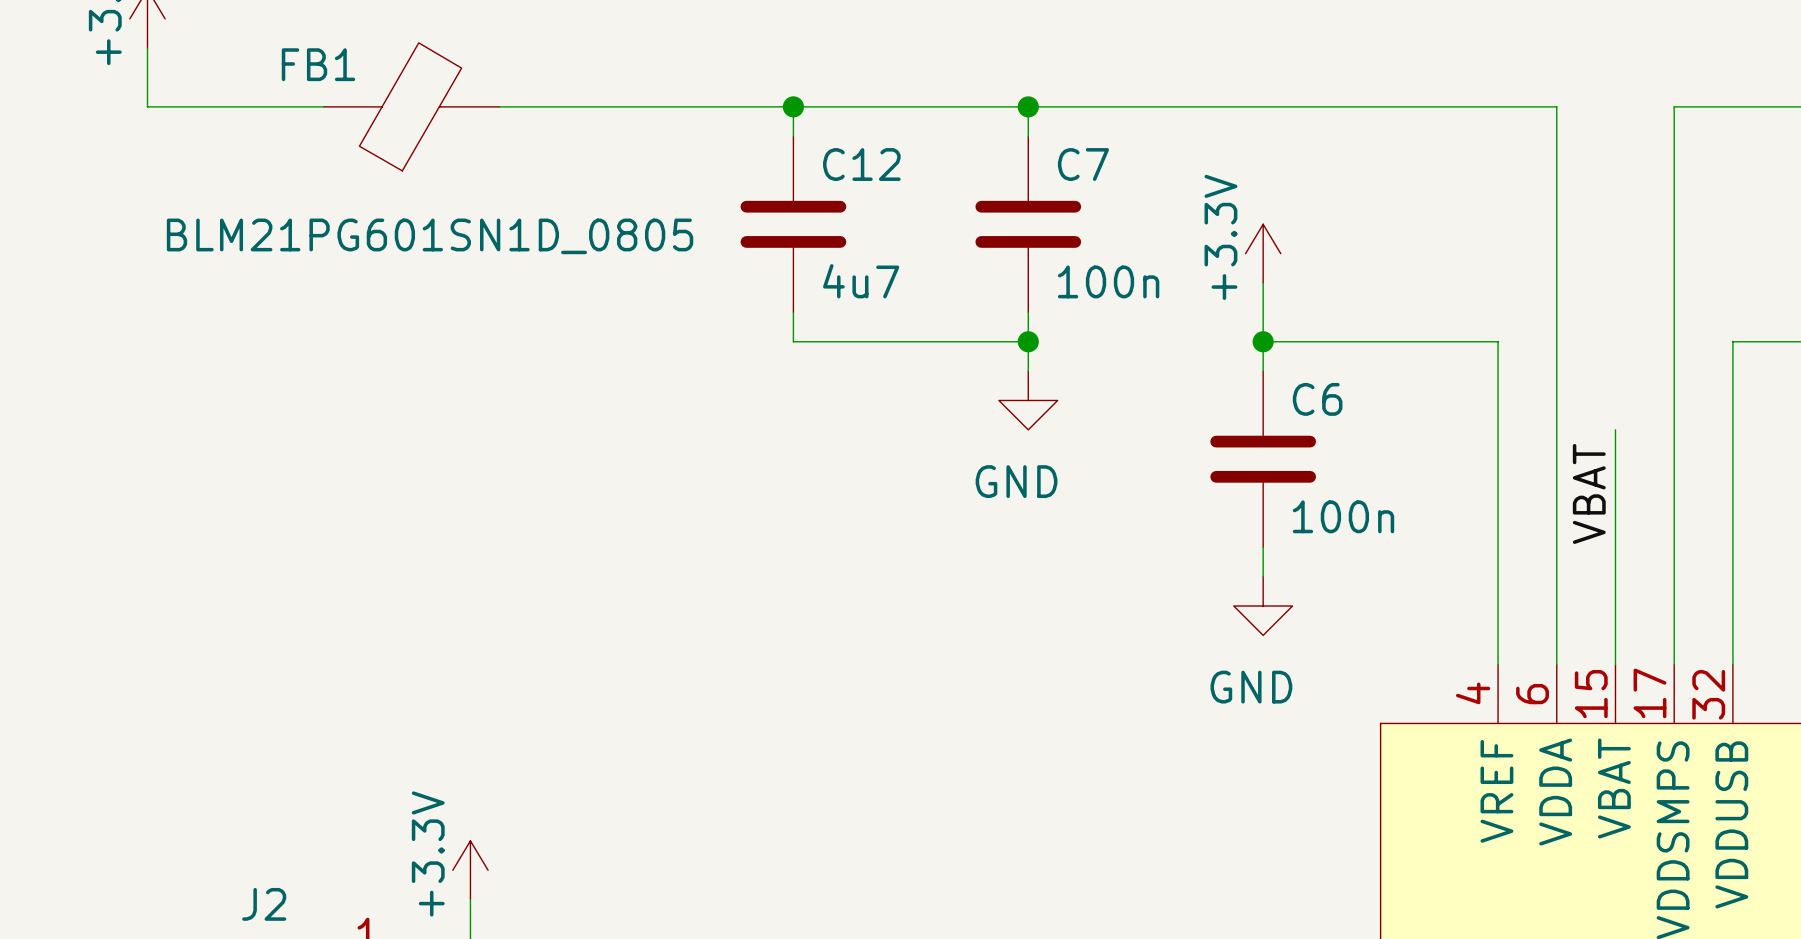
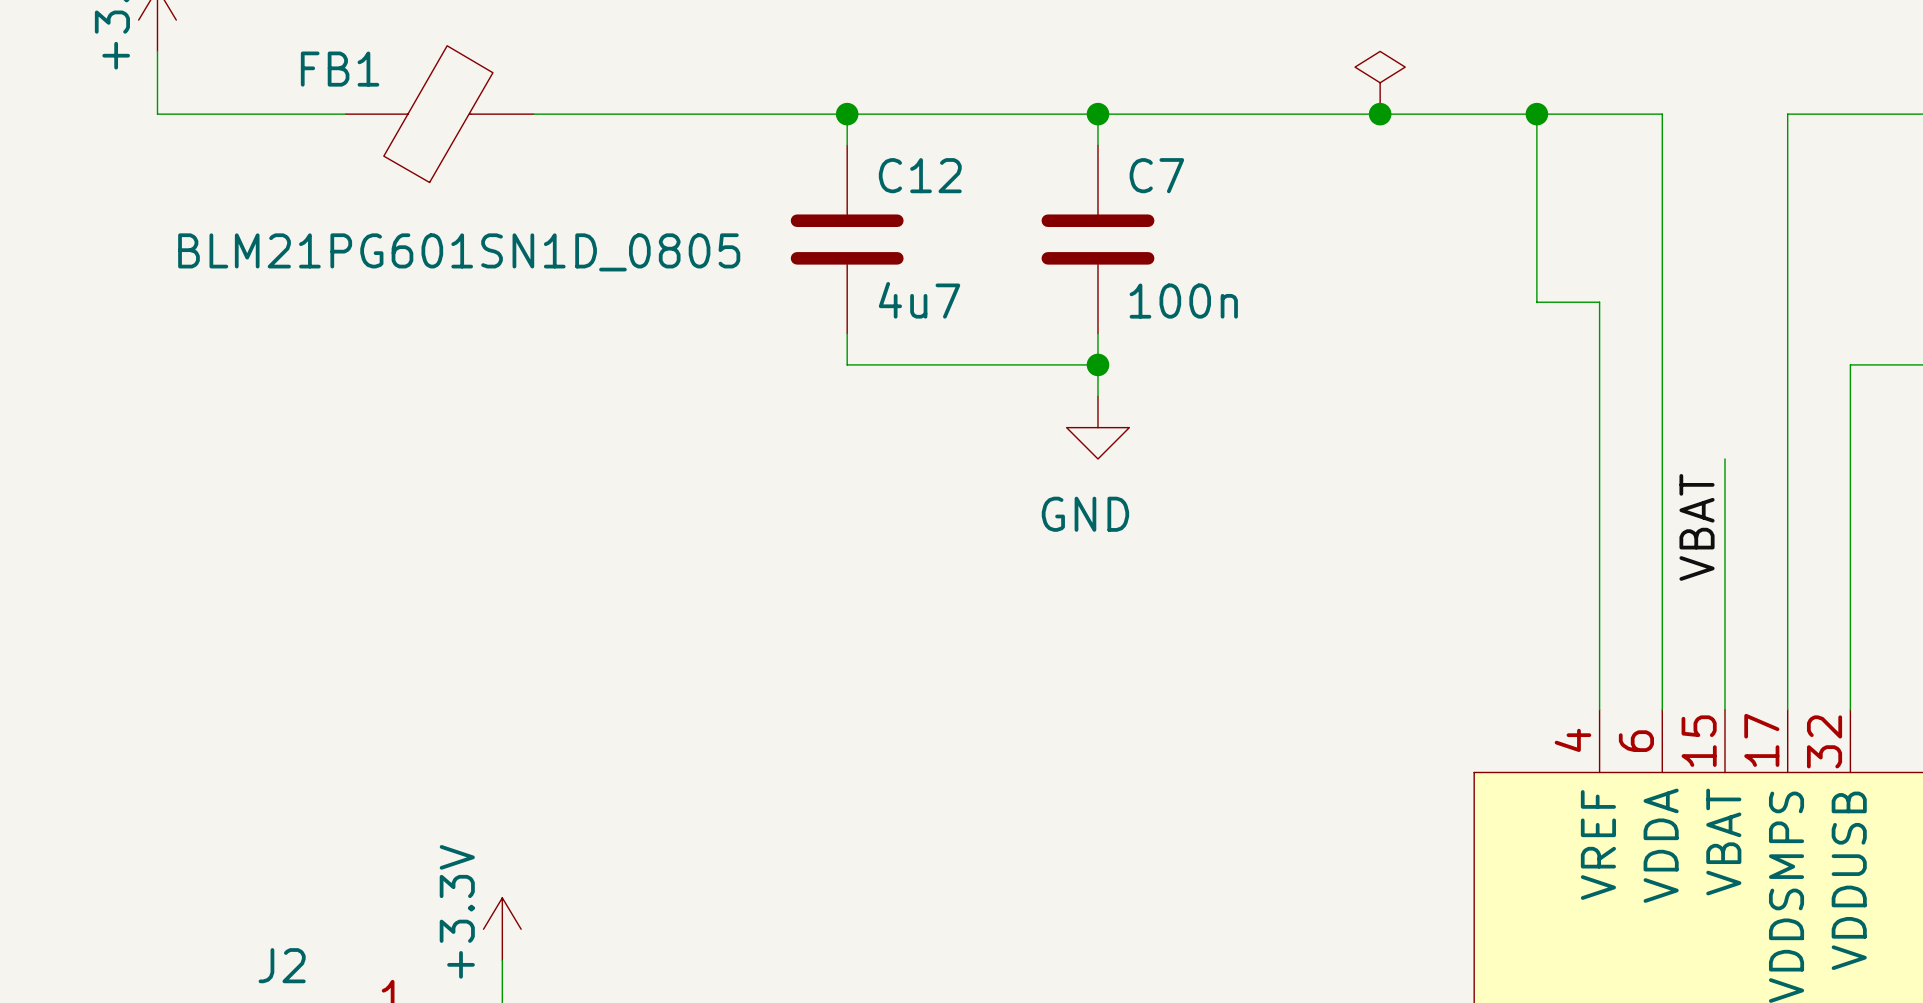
power symbol: none -> (1380, 82)
junction: none -> (1380, 114)
junction: none -> (1536, 114)
power symbol: +3.3V (1263, 253) -> none
wire: (1263, 283) (1263, 371) -> none
wire: (1263, 341) (1498, 341) -> (1536, 114) (1536, 302) (1599, 302) (1599, 364)
junction: (1263, 341) -> none
C6: 100n (1263, 459) -> none
wire: (1263, 547) (1263, 576) -> none
power symbol: GND (1263, 606) -> none

